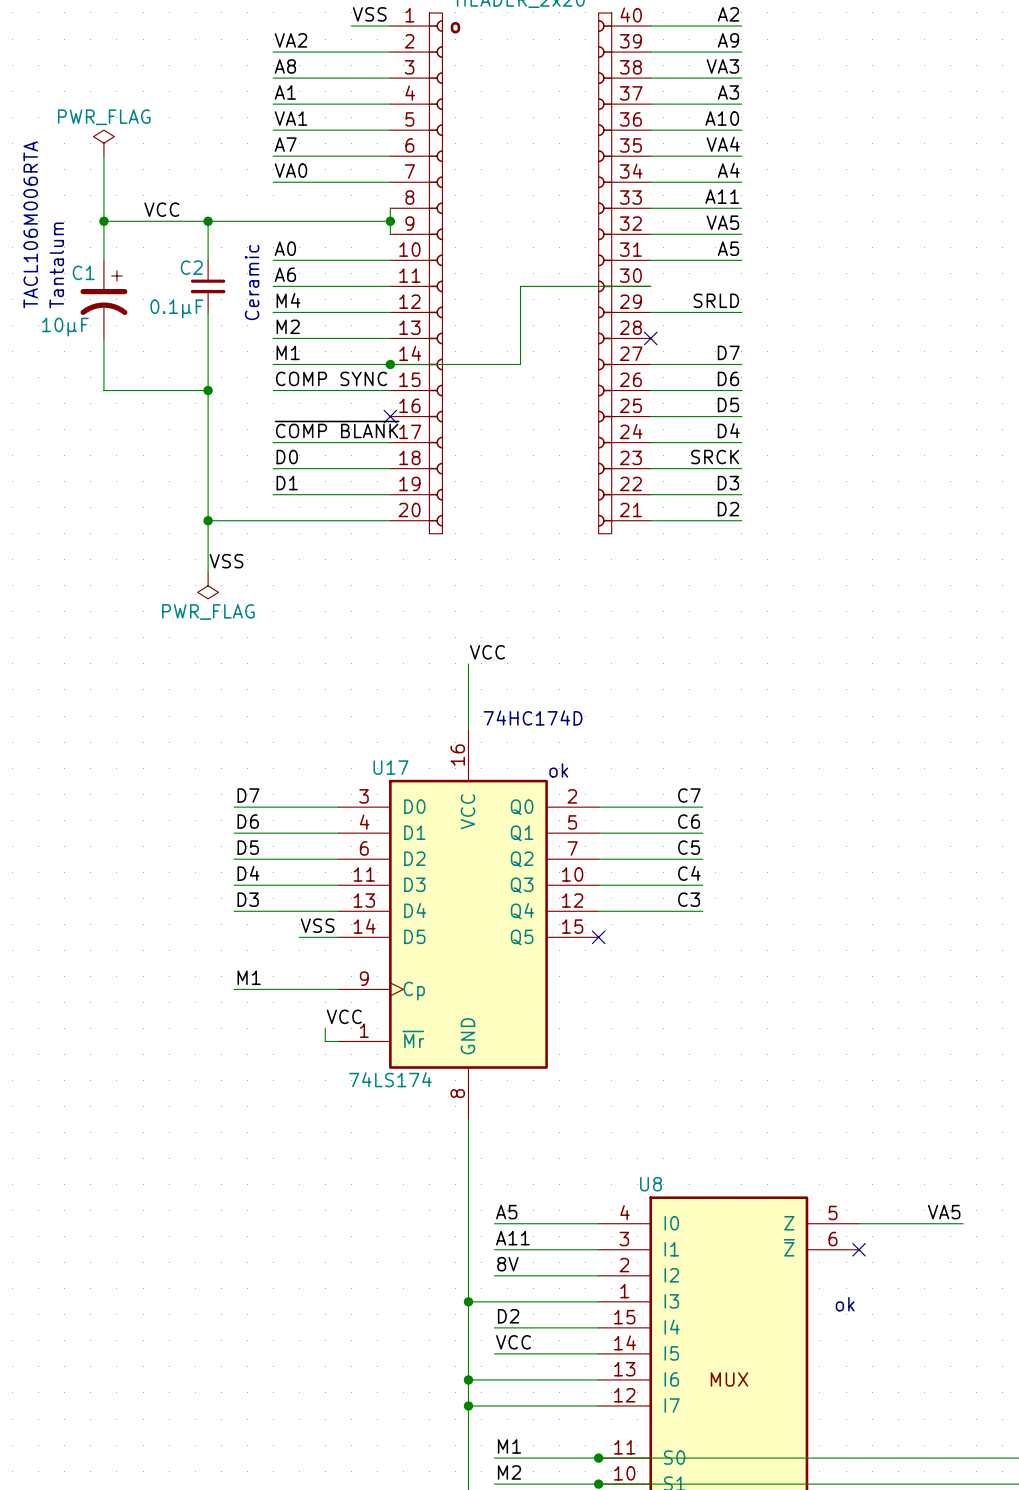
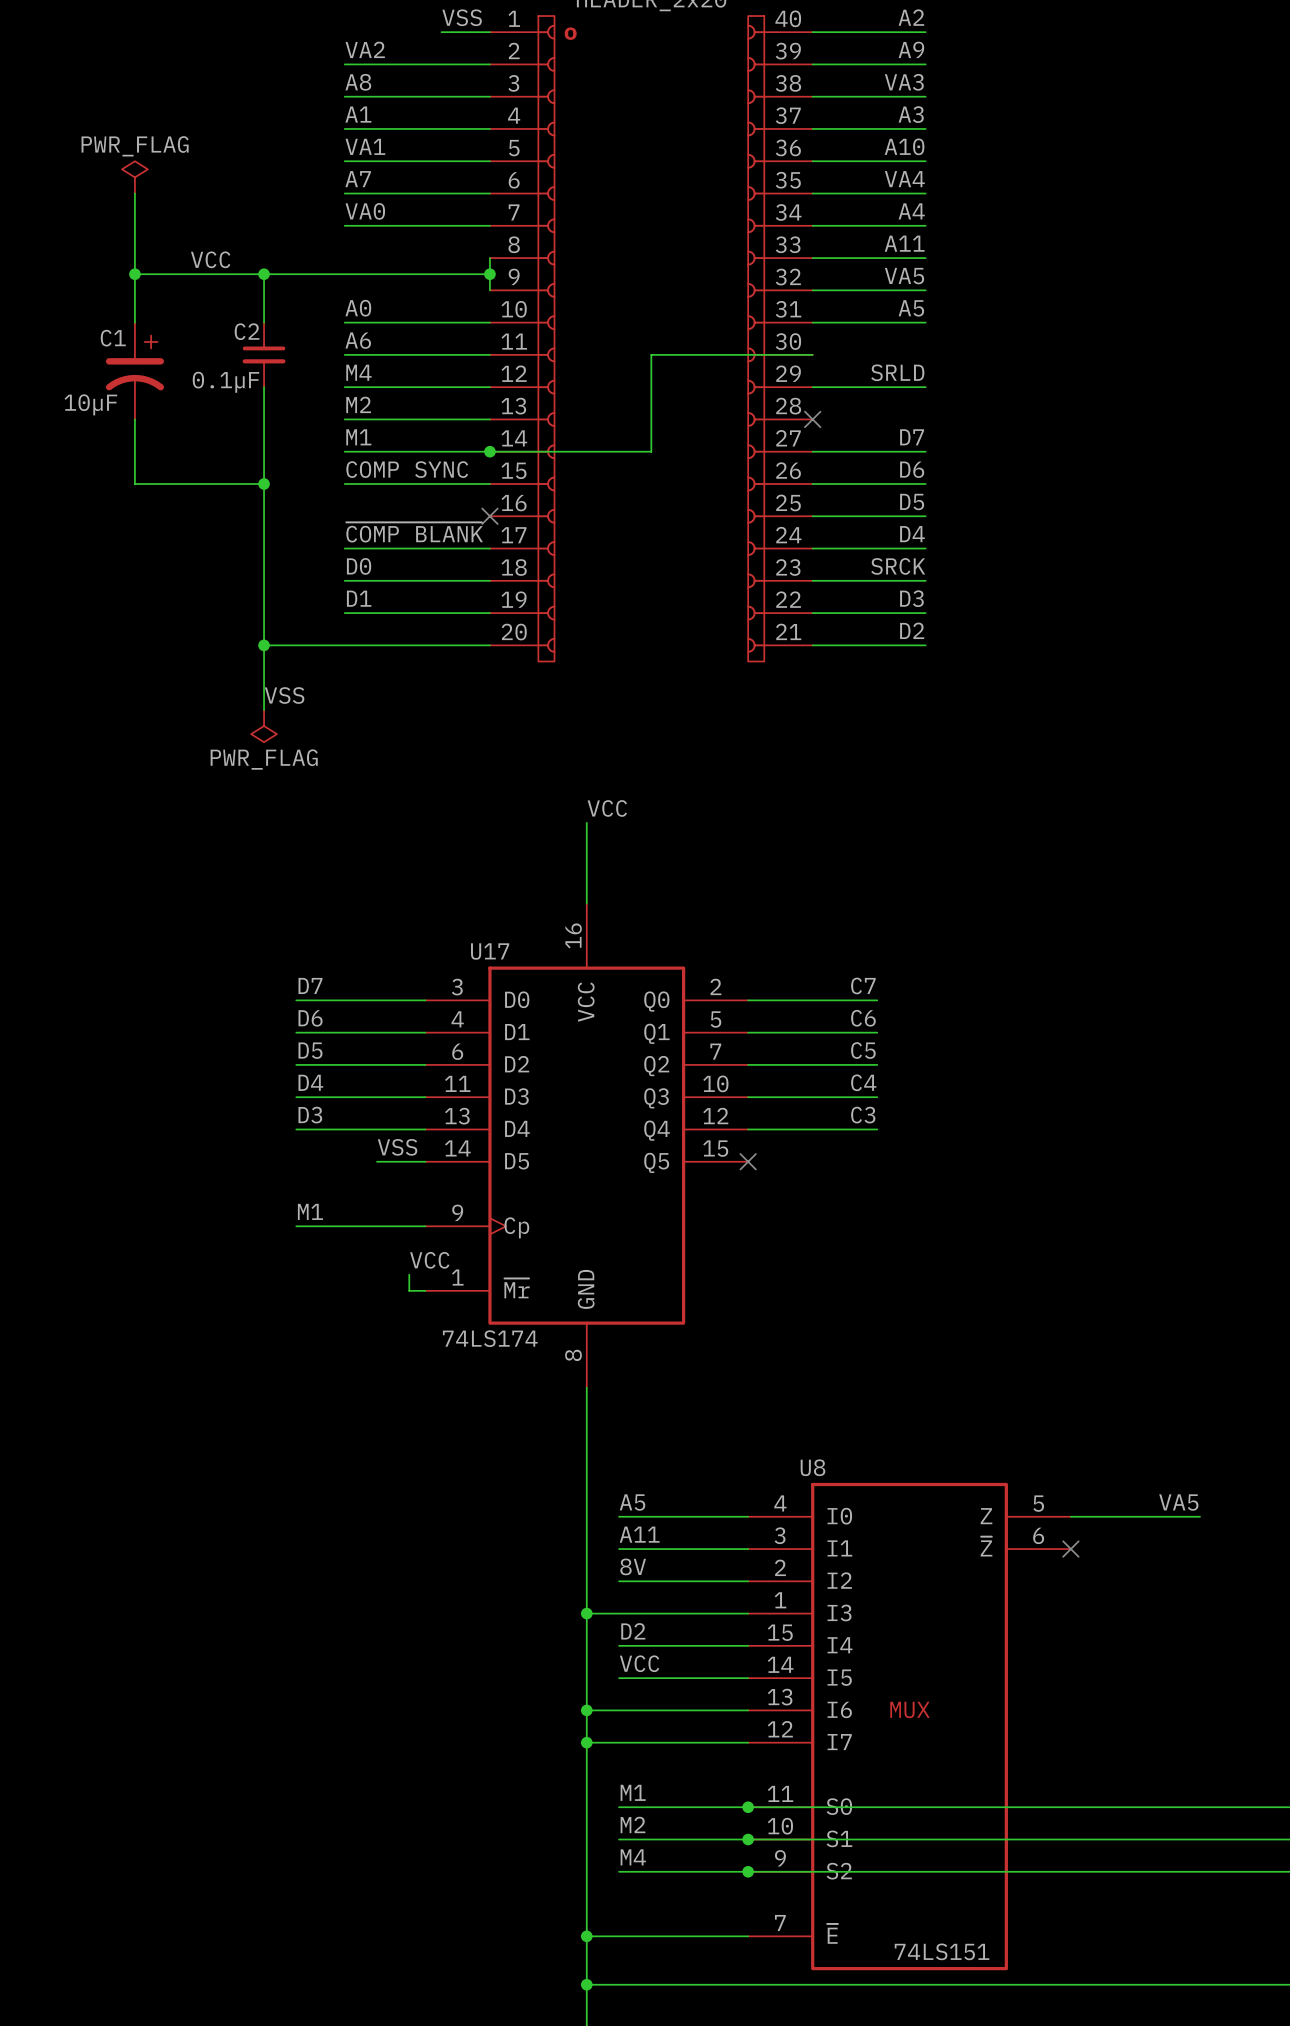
text: TACL106M006RTA (30, 224) -> none
text: Tantalum (56, 265) -> none
text: Ceramic (252, 282) -> none
text: 74HC174D (533, 718) -> none
text: ok (558, 770) -> none
text: ok (845, 1304) -> none

